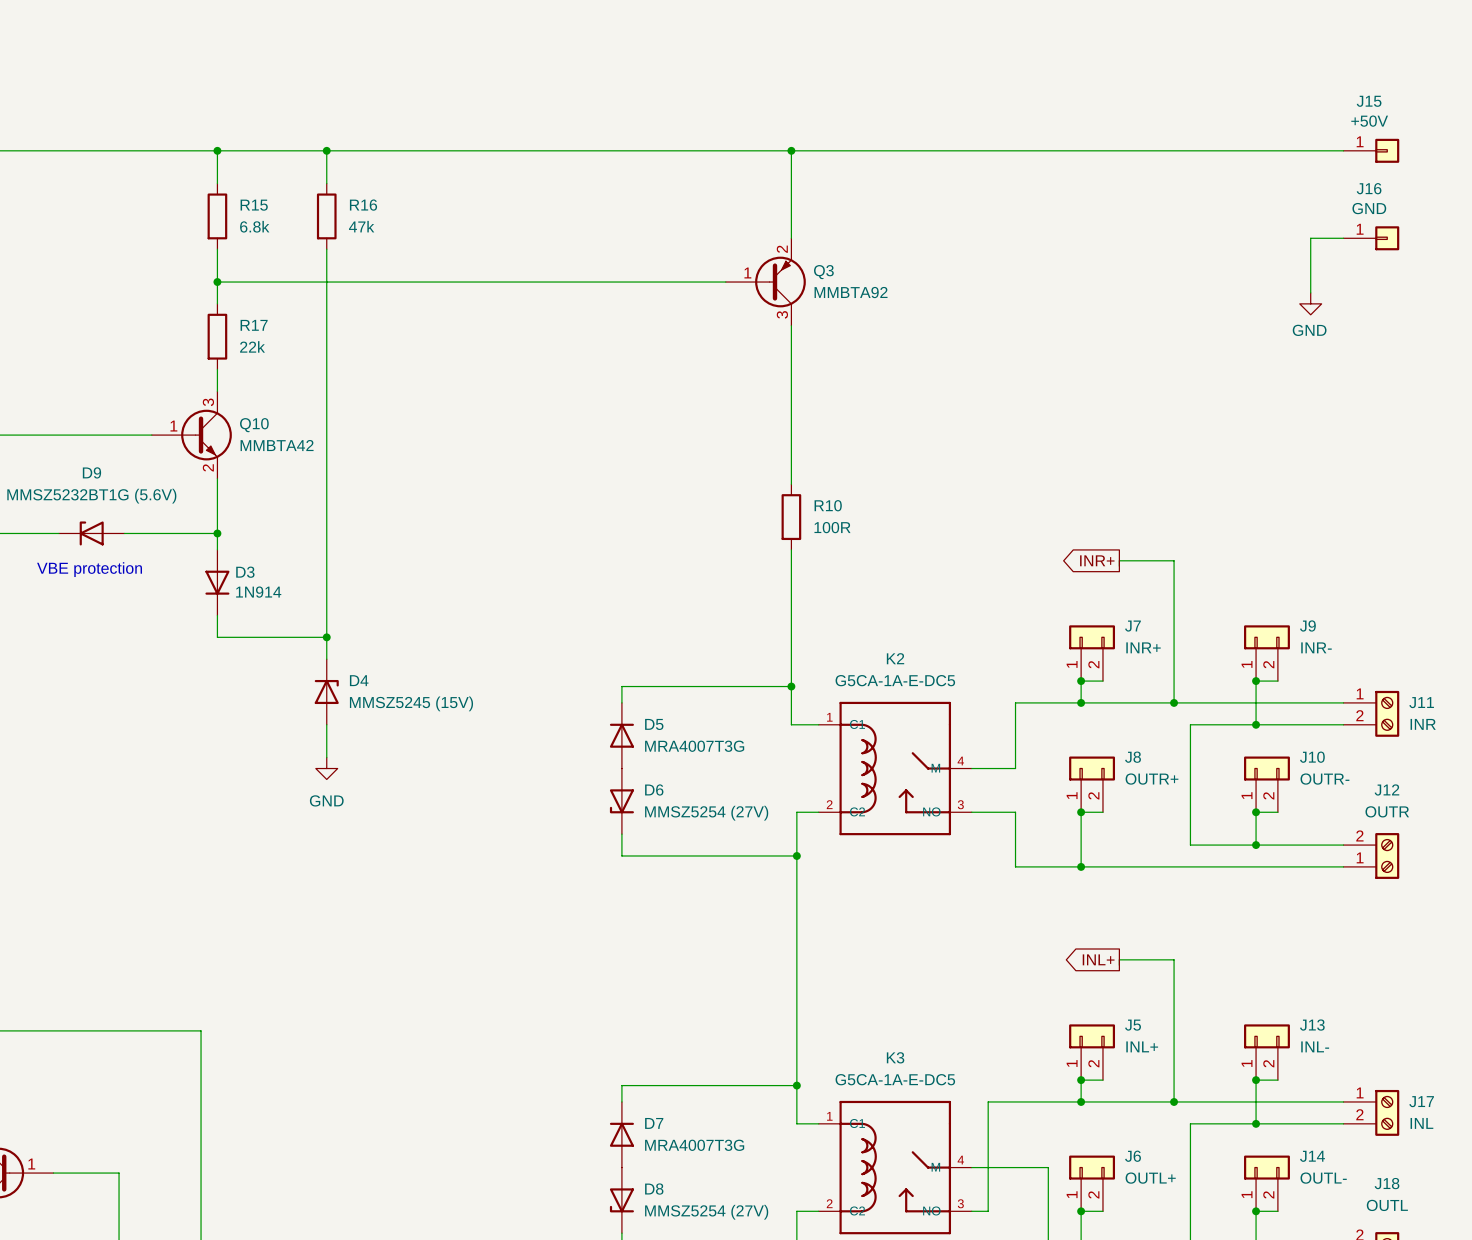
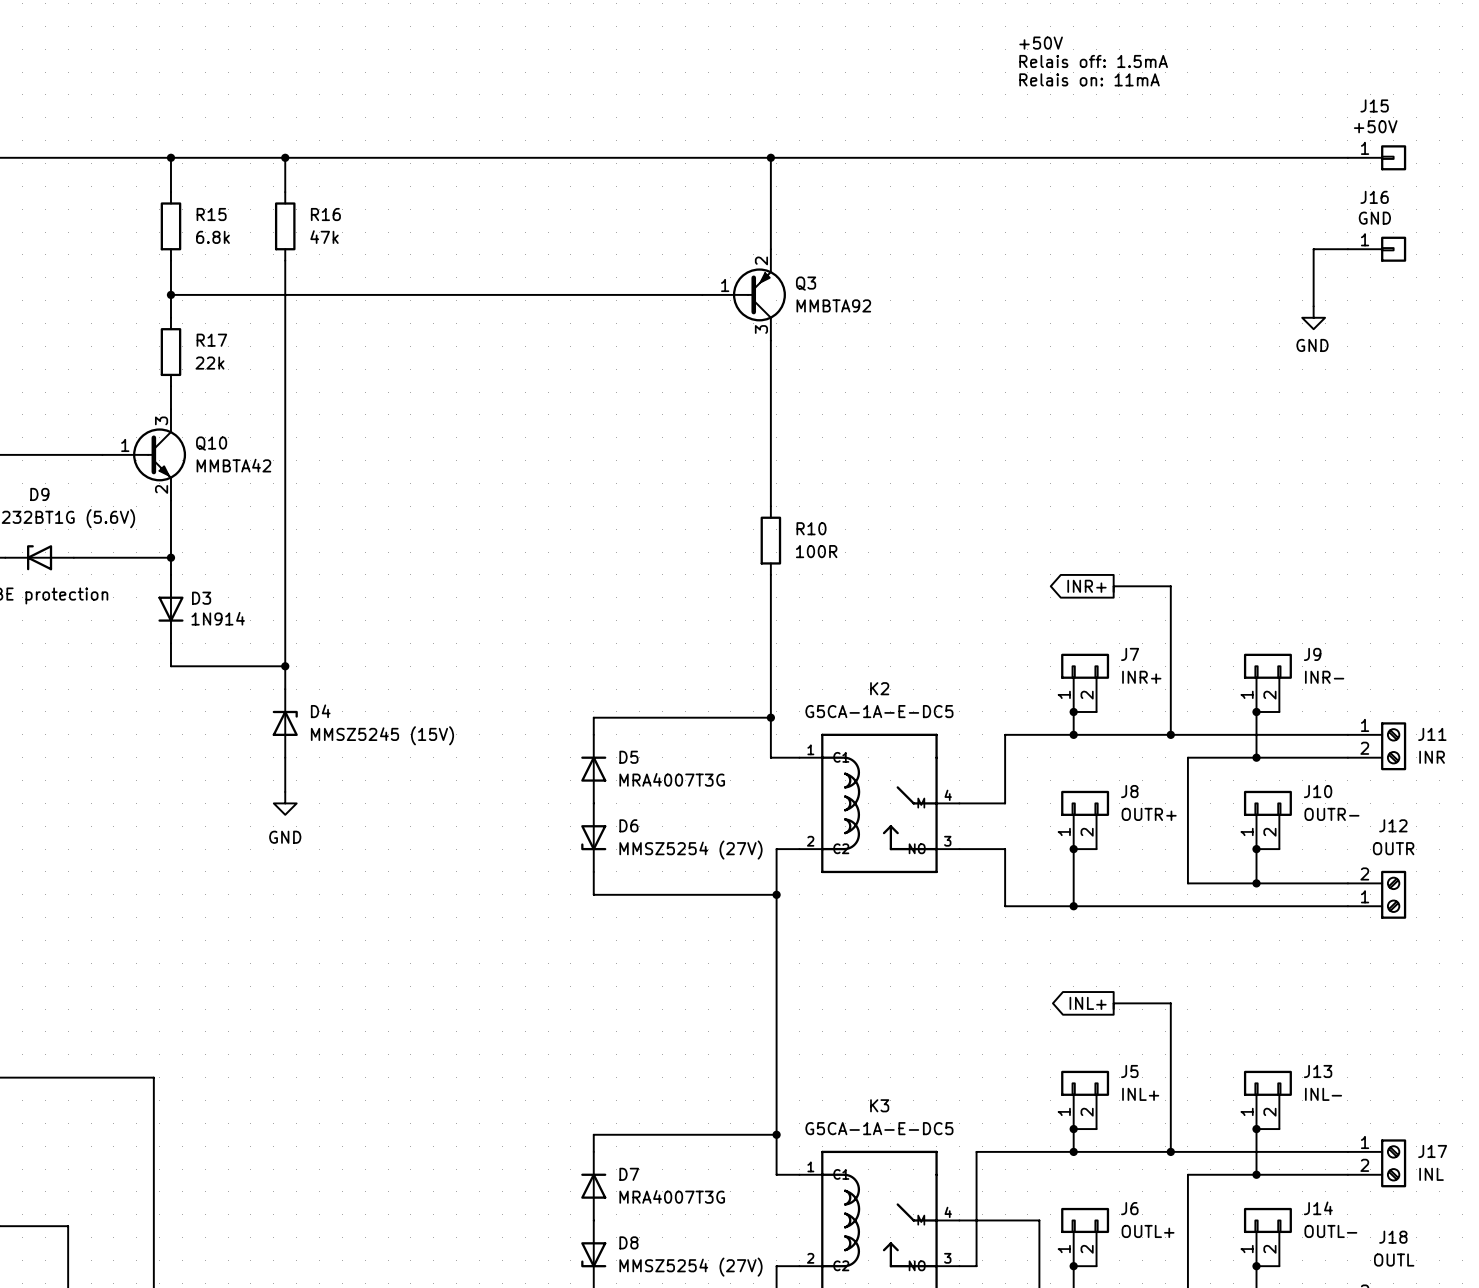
text: none -> +50V (1041, 43)
text: none -> Relais off: 1.5mA (1093, 61)
text: none -> Relais on: 11mA (1089, 79)

